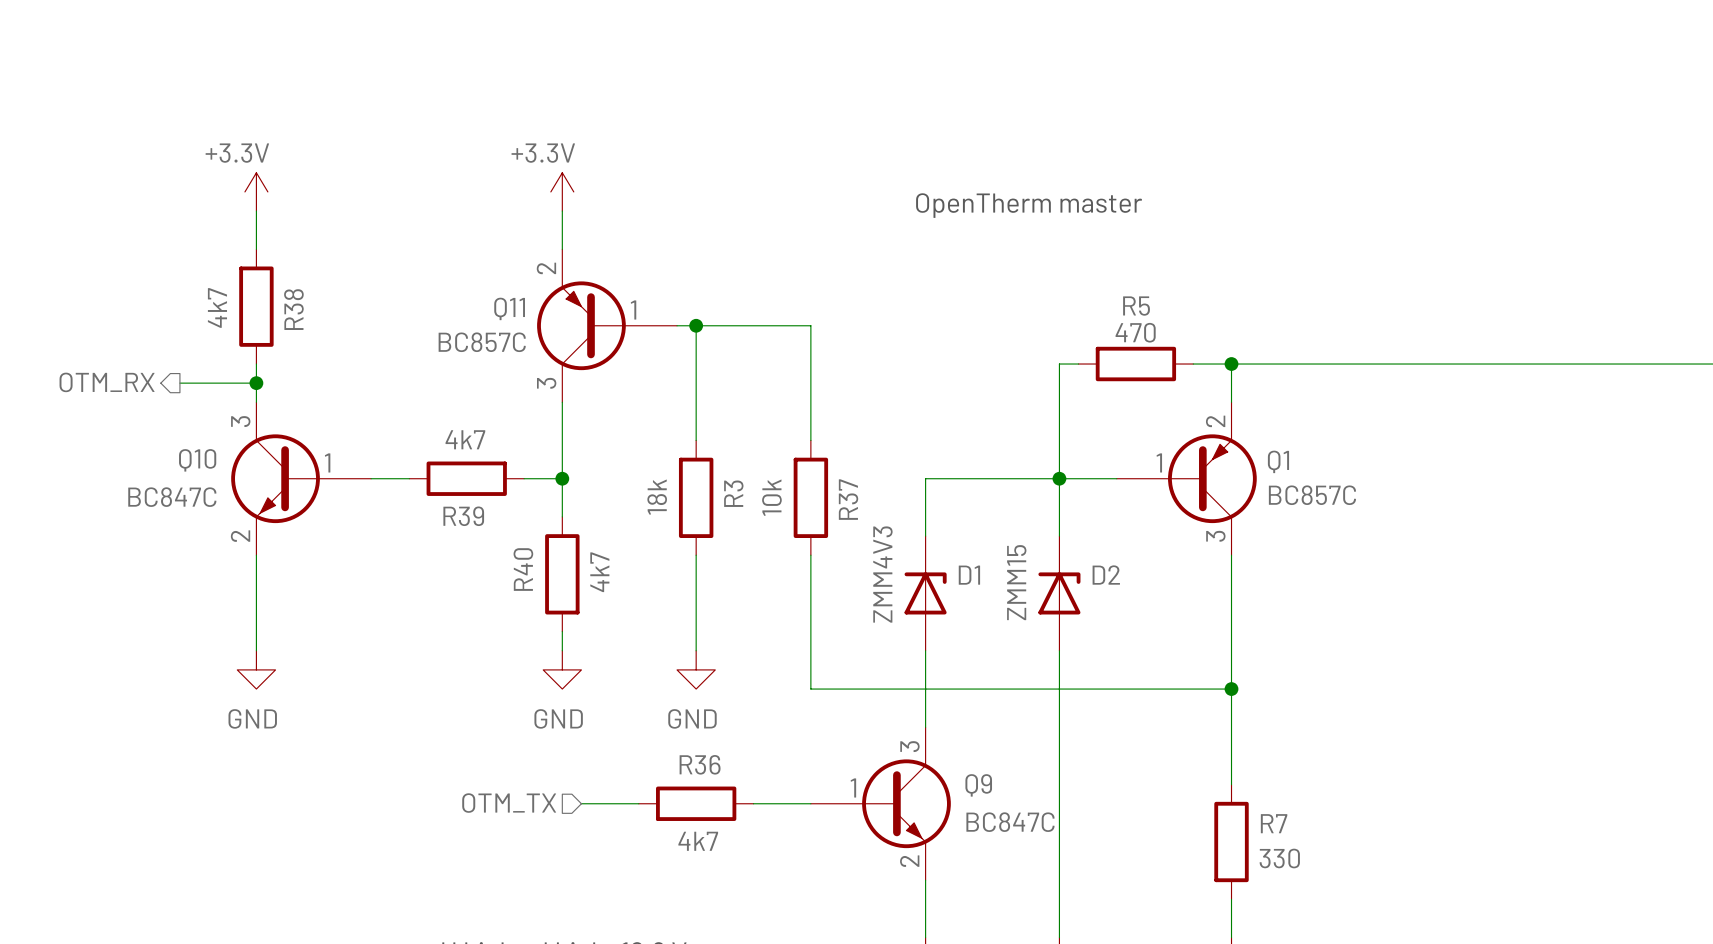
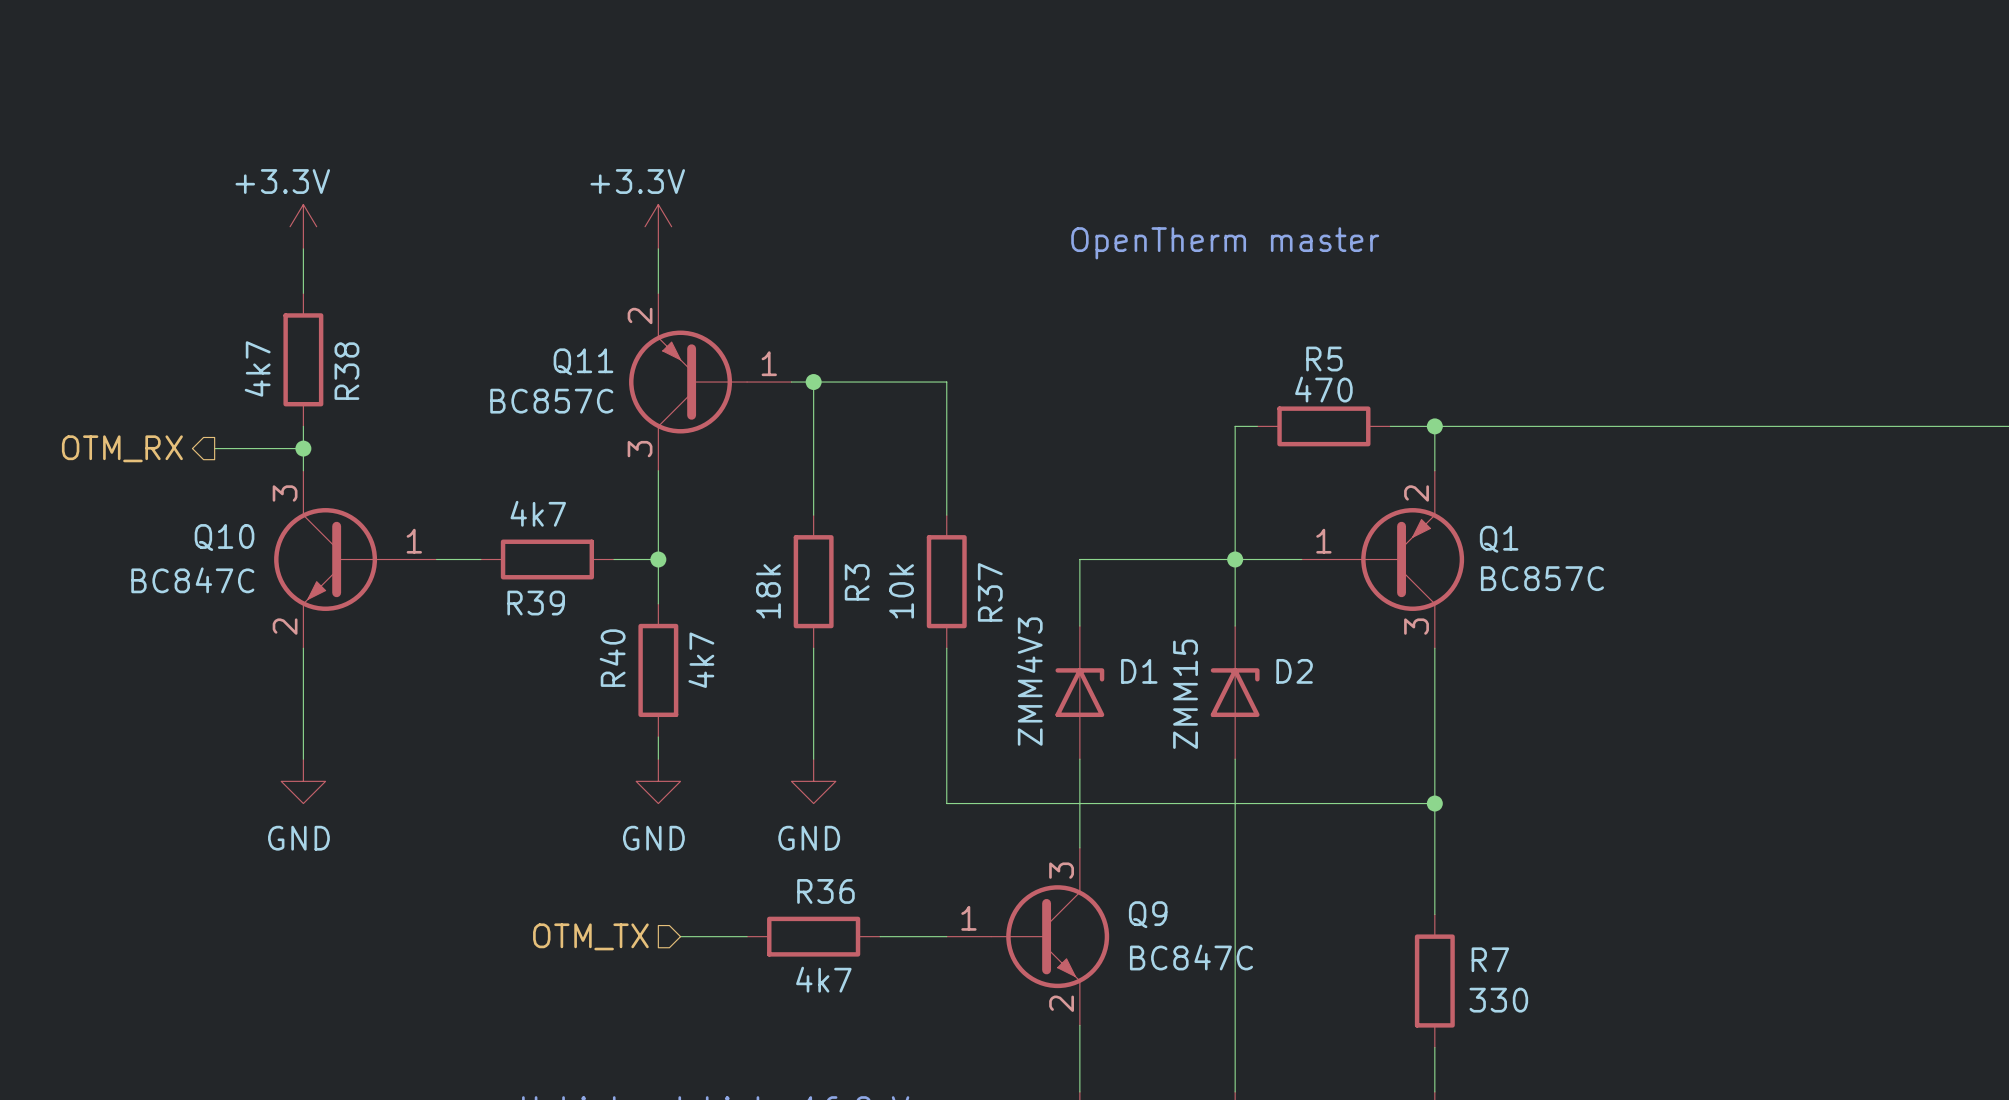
Q11 symbol: [537, 249, 678, 403] -> [629, 293, 792, 471]
Q10 symbol: [231, 402, 372, 556] -> [274, 470, 437, 649]
Q1 symbol: [1116, 402, 1257, 556] -> [1301, 470, 1465, 649]
Q9 symbol: [810, 727, 951, 881] -> [946, 847, 1110, 1026]

